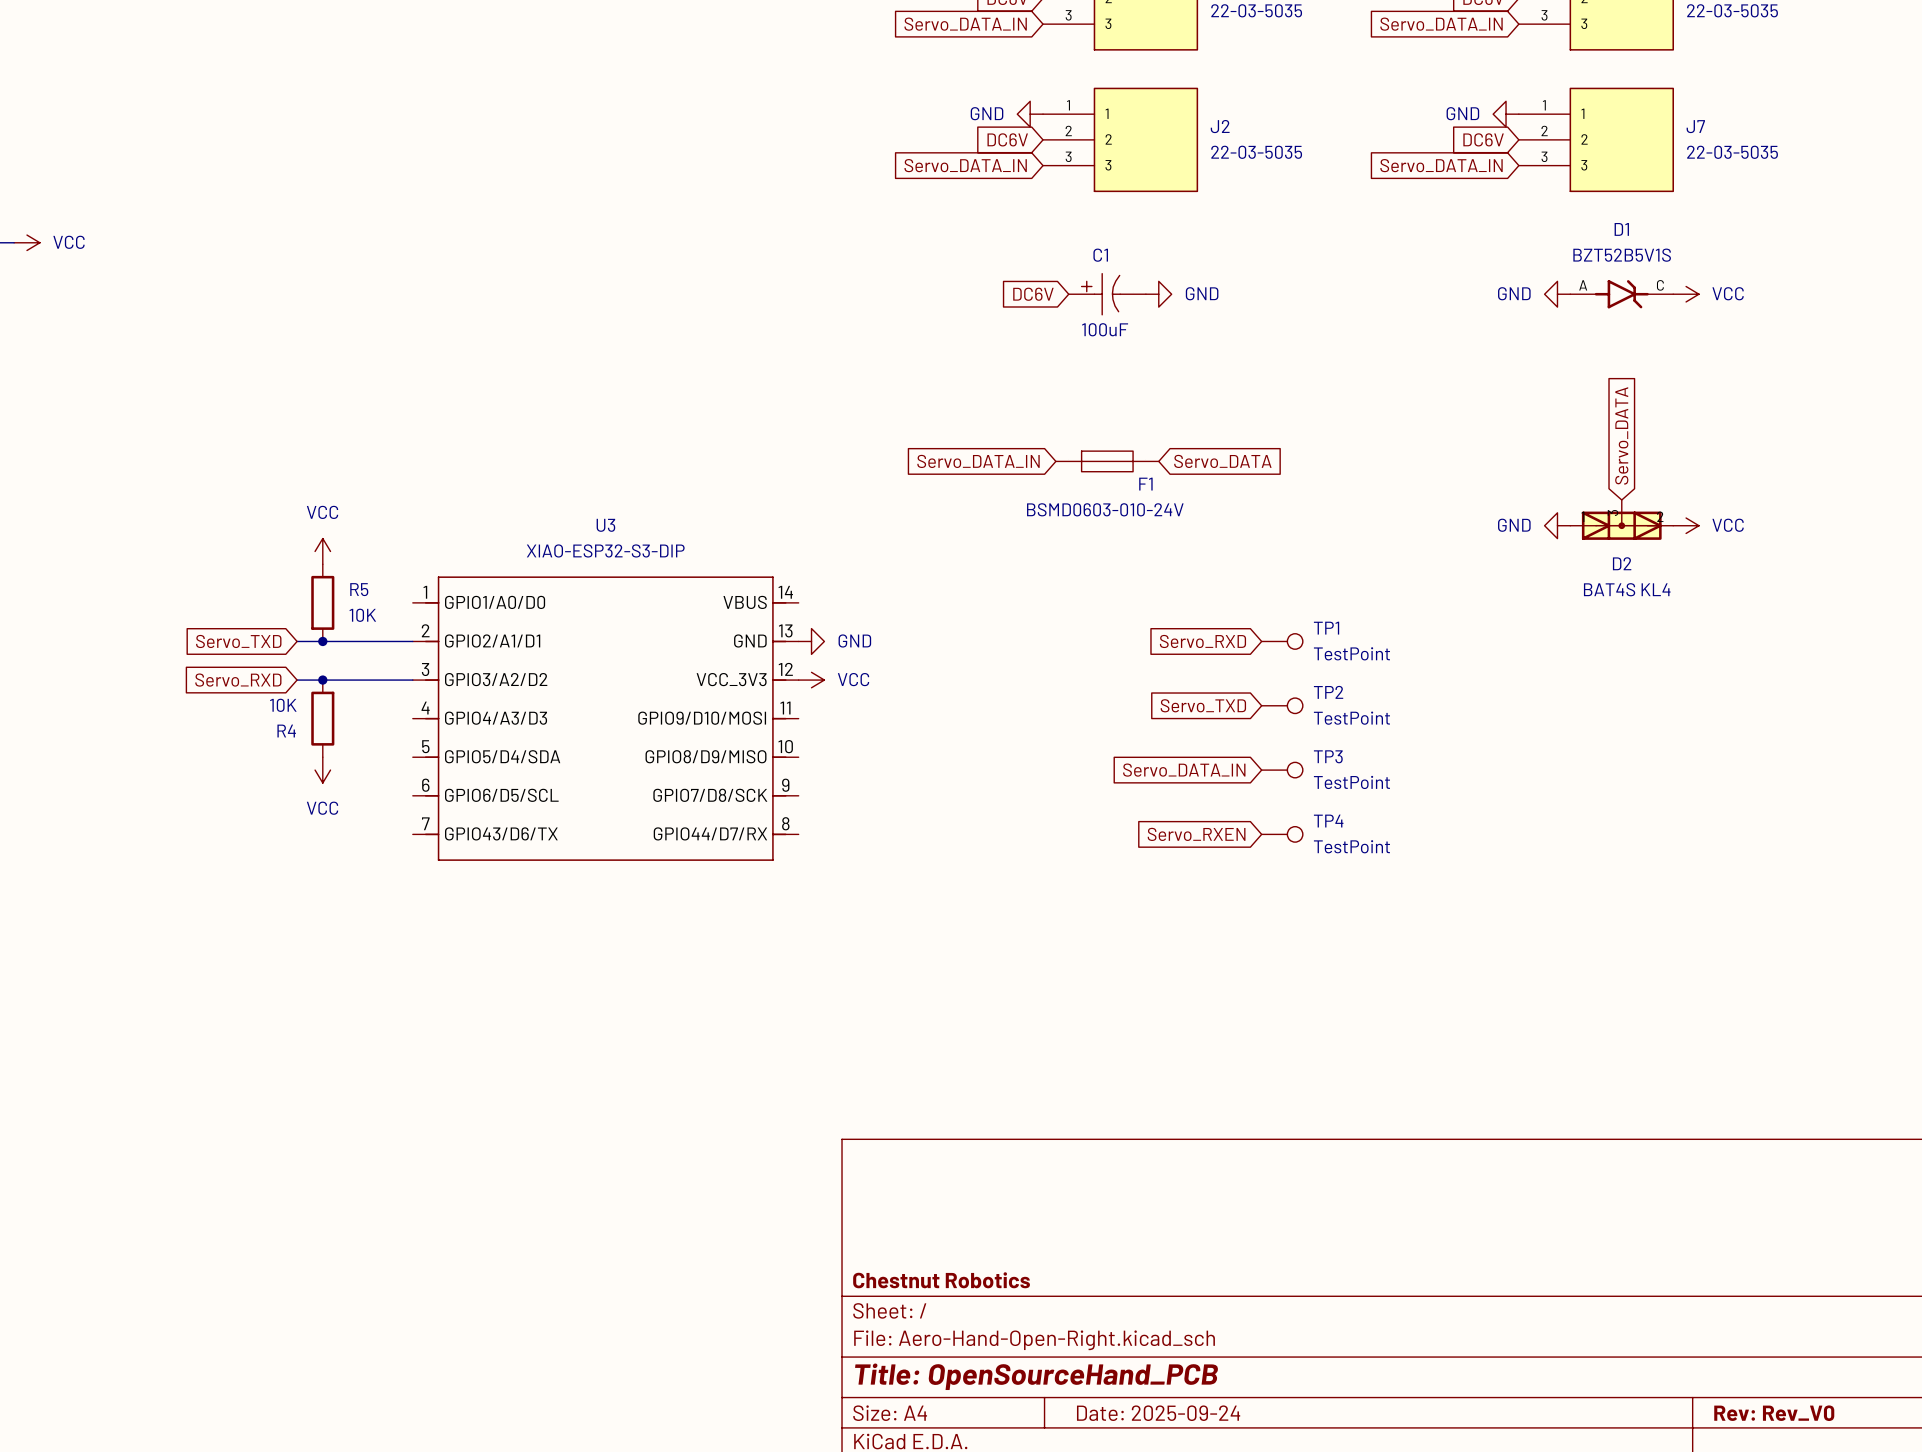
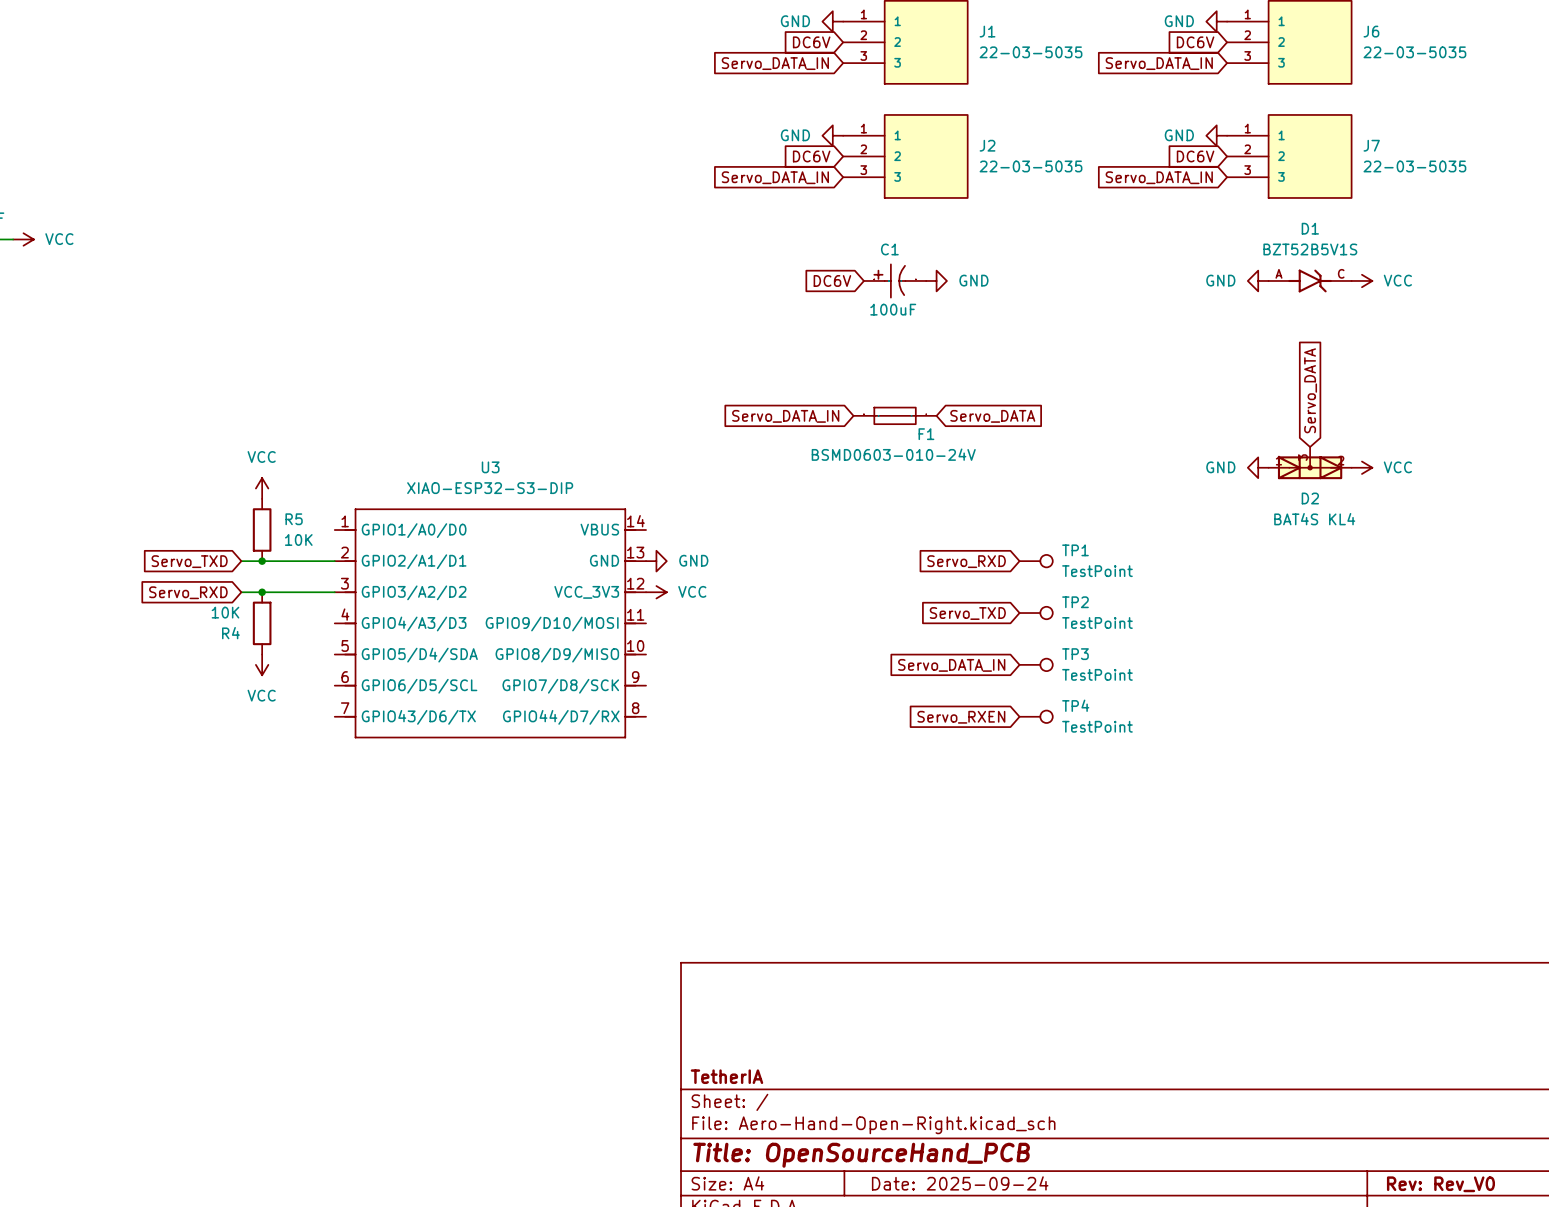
title block: Chestnut Robotics (941, 1280) -> TetherIA (726, 1076)

